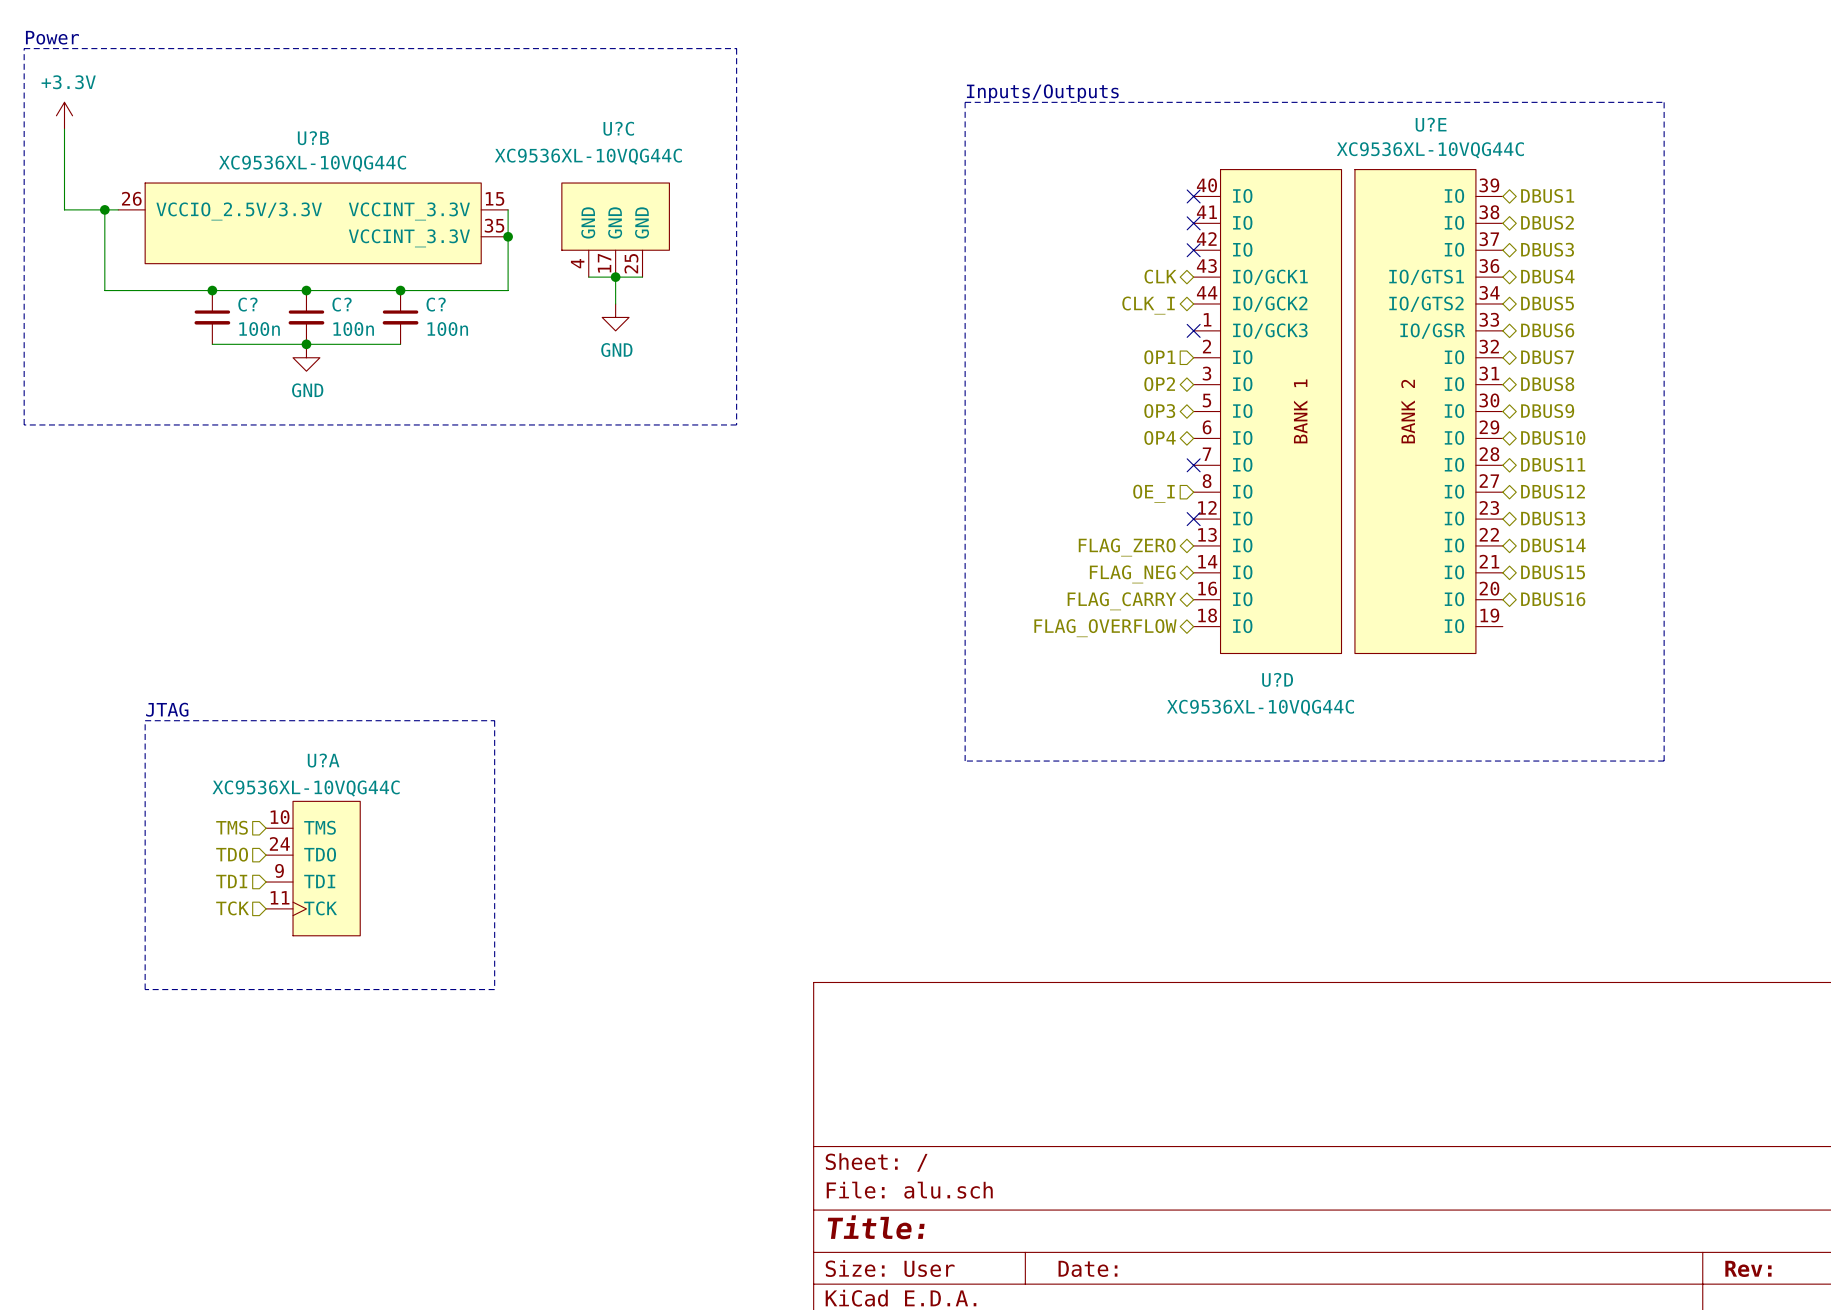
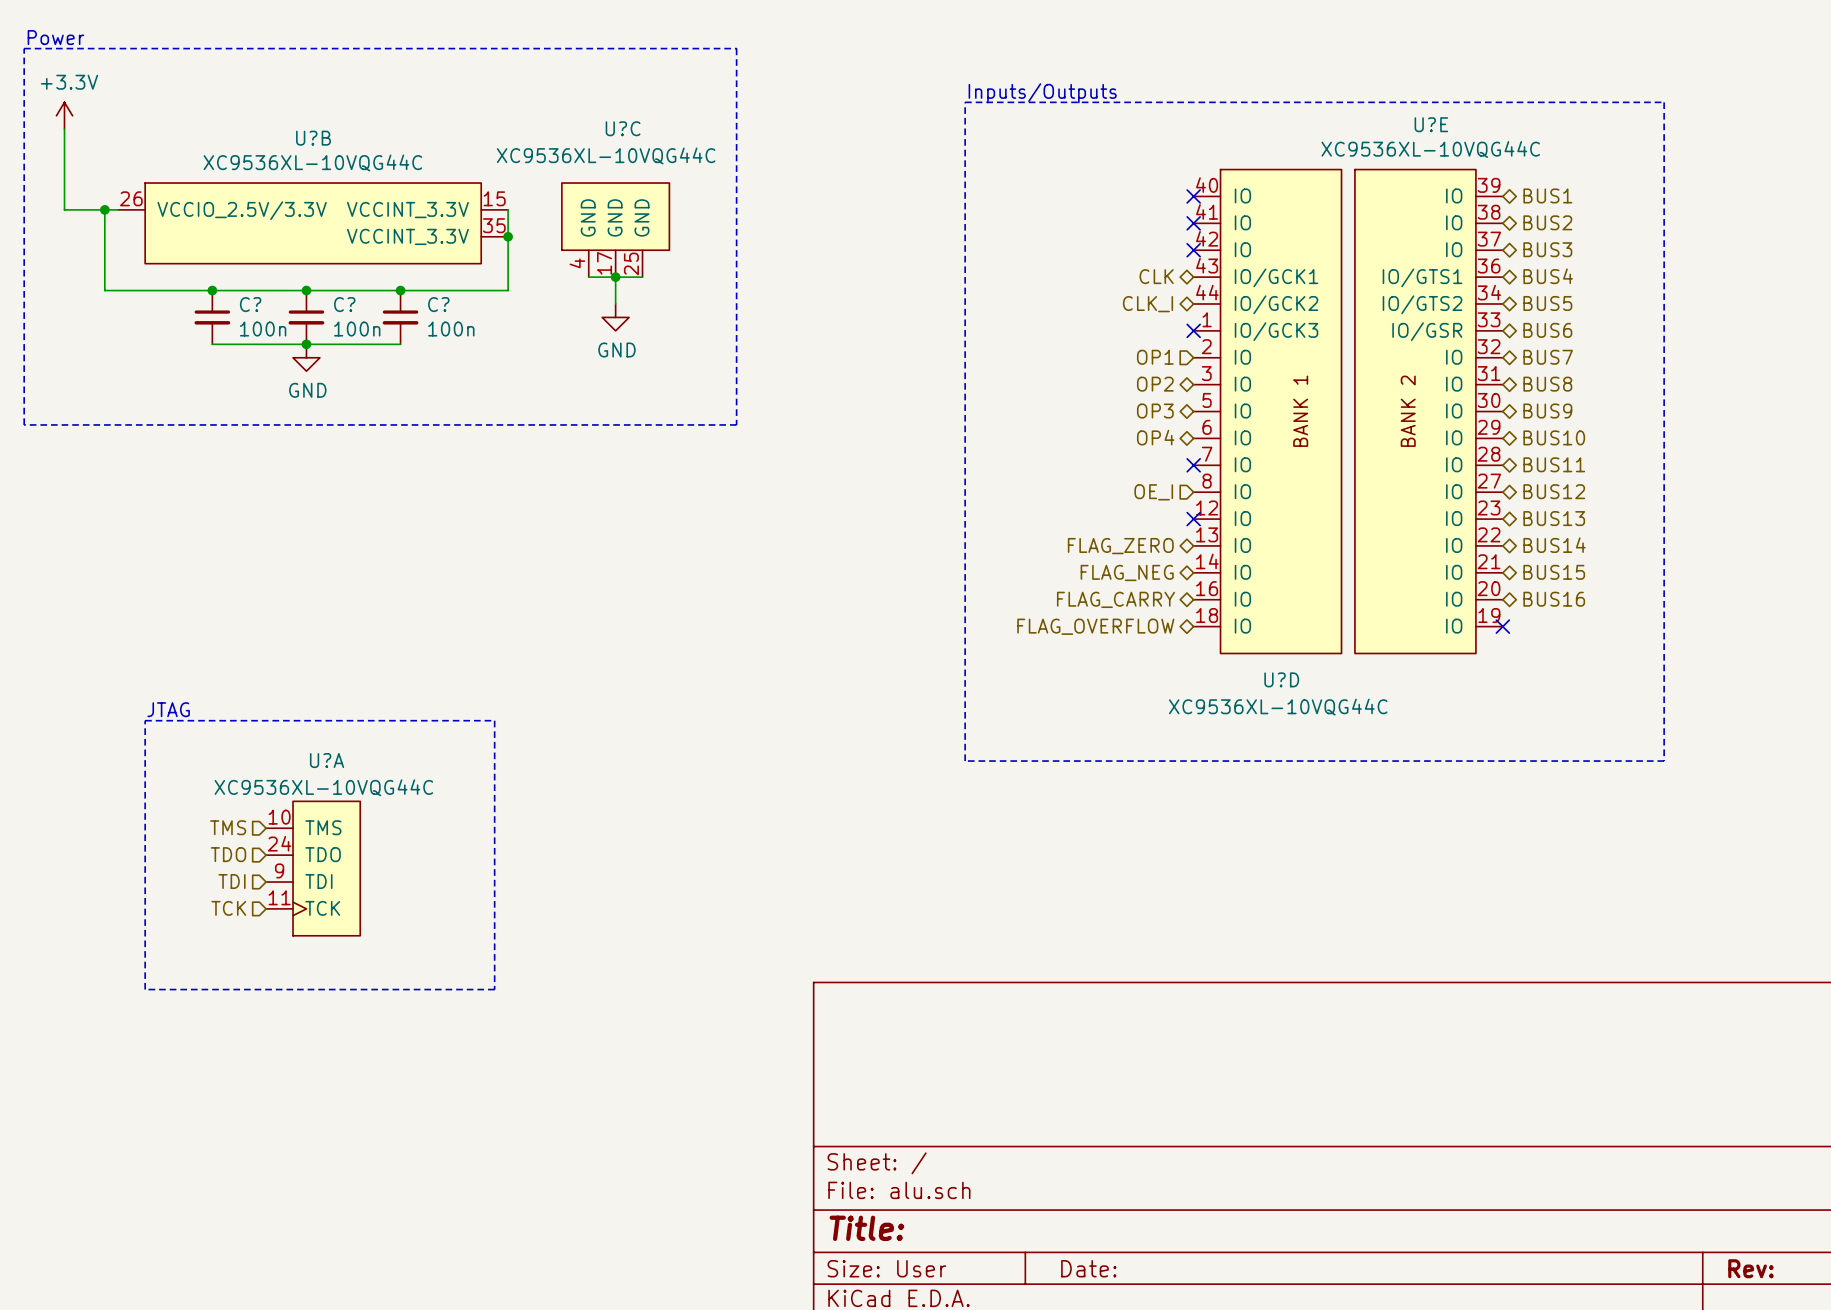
hierarchical label: DBUS1 (1547, 195) -> BUS1 (1547, 195)
hierarchical label: DBUS2 (1547, 222) -> BUS2 (1547, 222)
hierarchical label: DBUS3 (1547, 249) -> BUS3 (1547, 249)
hierarchical label: DBUS4 (1547, 276) -> BUS4 (1548, 276)
hierarchical label: DBUS5 (1547, 303) -> BUS5 (1547, 303)
hierarchical label: DBUS6 (1547, 330) -> BUS6 (1547, 330)
hierarchical label: DBUS7 (1547, 357) -> BUS7 (1548, 357)
hierarchical label: DBUS8 (1547, 384) -> BUS8 (1547, 384)
hierarchical label: DBUS9 (1547, 411) -> BUS9 (1547, 411)
hierarchical label: DBUS10 (1553, 437) -> BUS10 (1554, 437)
hierarchical label: DBUS11 (1553, 464) -> BUS11 (1554, 464)
hierarchical label: DBUS12 (1553, 491) -> BUS12 (1554, 491)
hierarchical label: DBUS13 (1553, 518) -> BUS13 (1554, 518)
hierarchical label: DBUS14 (1553, 545) -> BUS14 (1554, 545)
hierarchical label: DBUS15 (1553, 572) -> BUS15 (1554, 572)
hierarchical label: DBUS16 (1553, 599) -> BUS16 (1554, 599)
no-connect mark: none -> (1502, 626)

